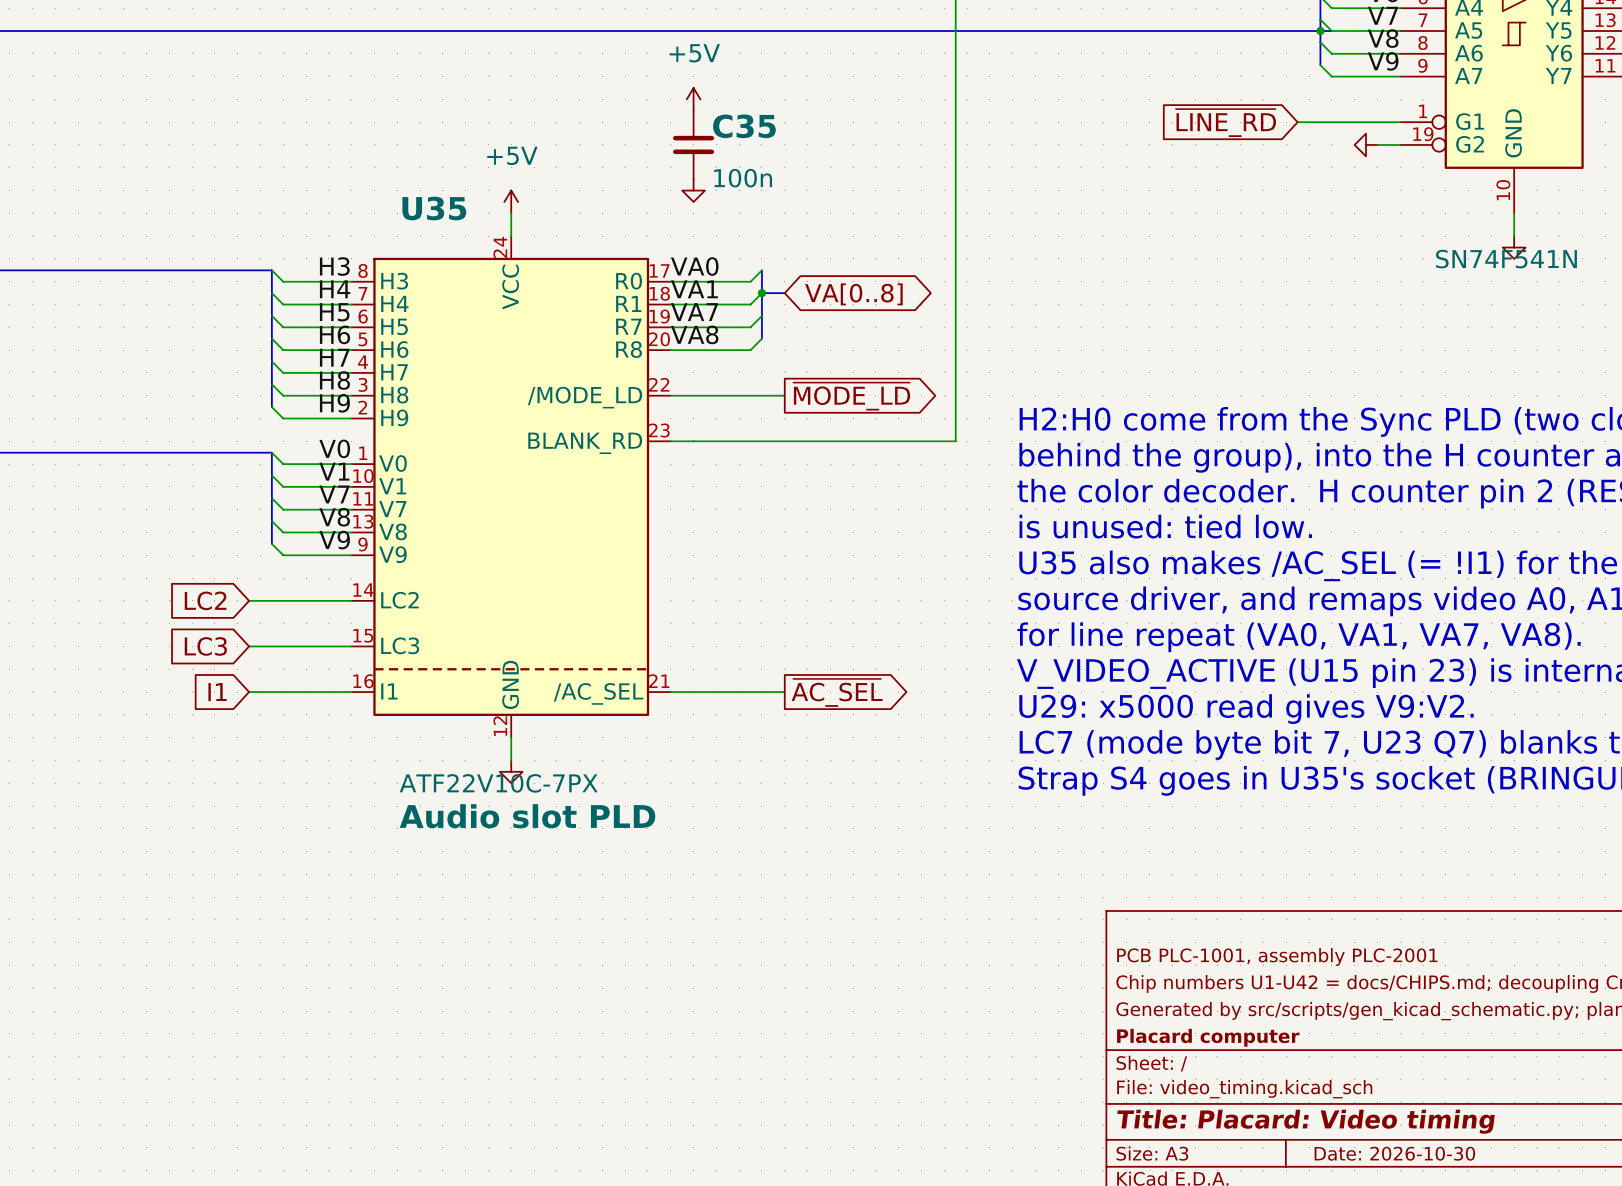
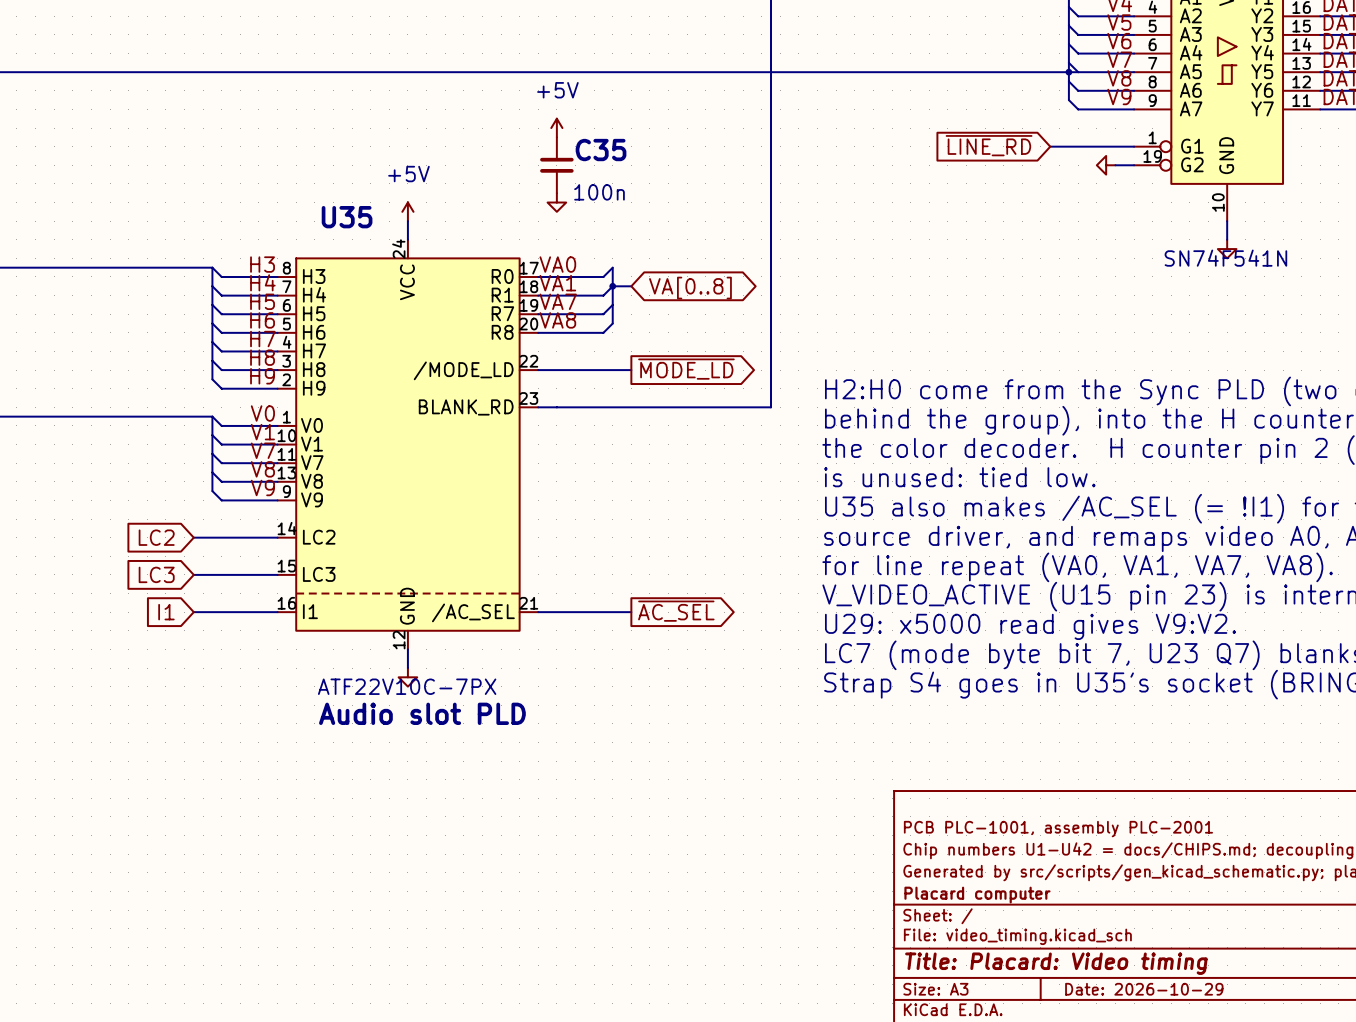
title block: Date: 2026-10-30 (1394, 1153) -> Date: 2026-10-29 (1144, 989)

